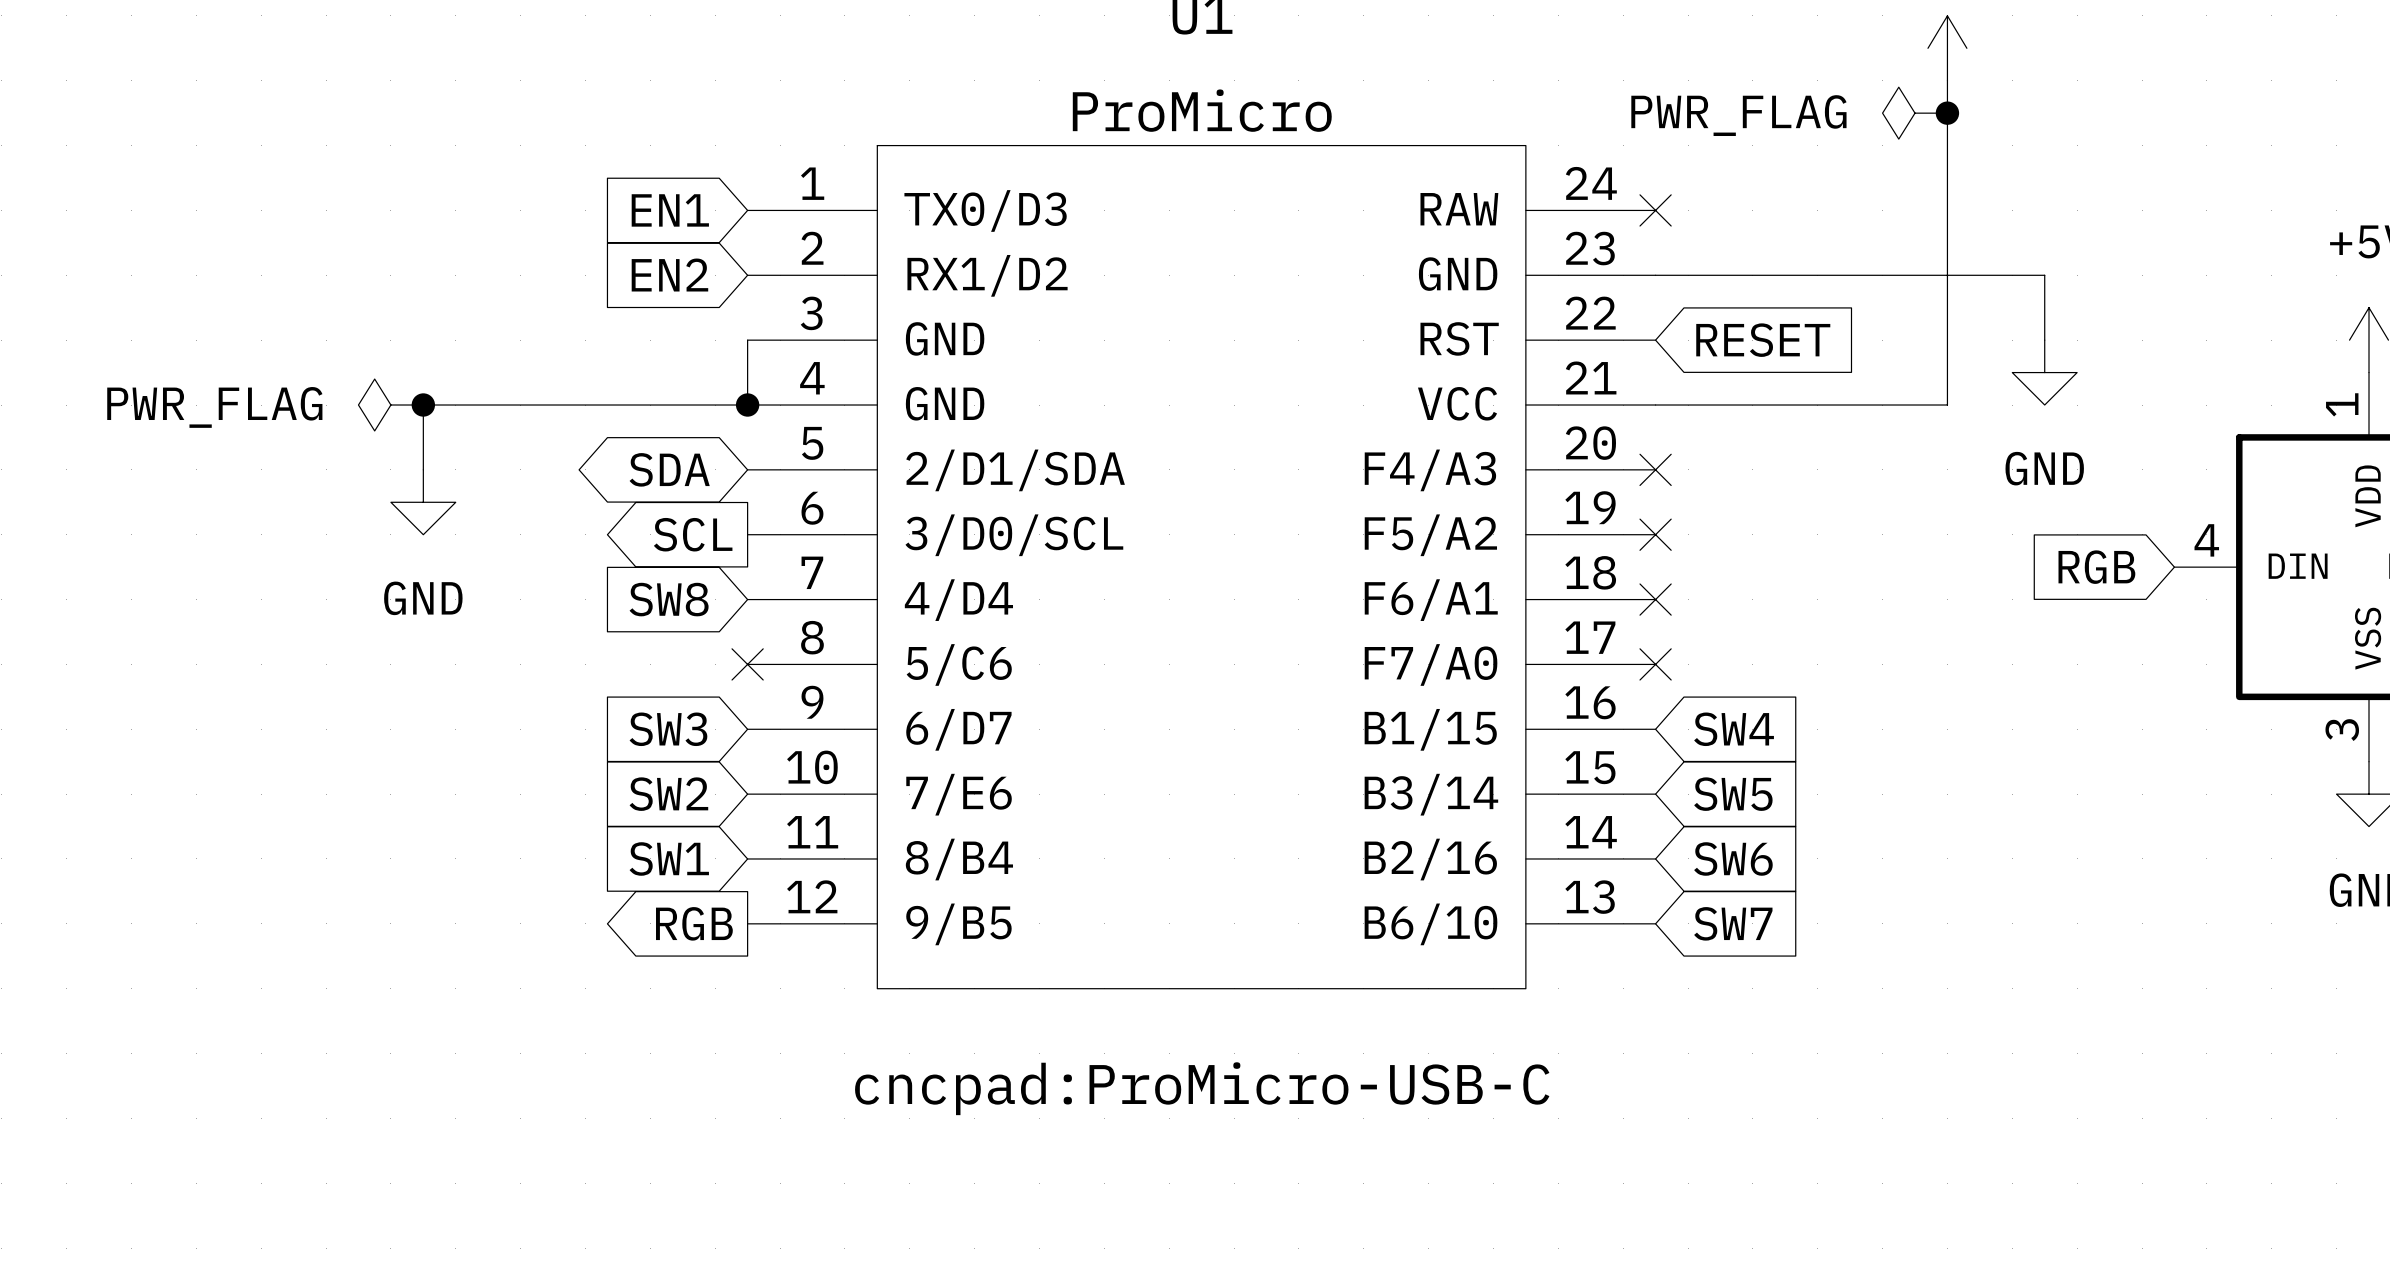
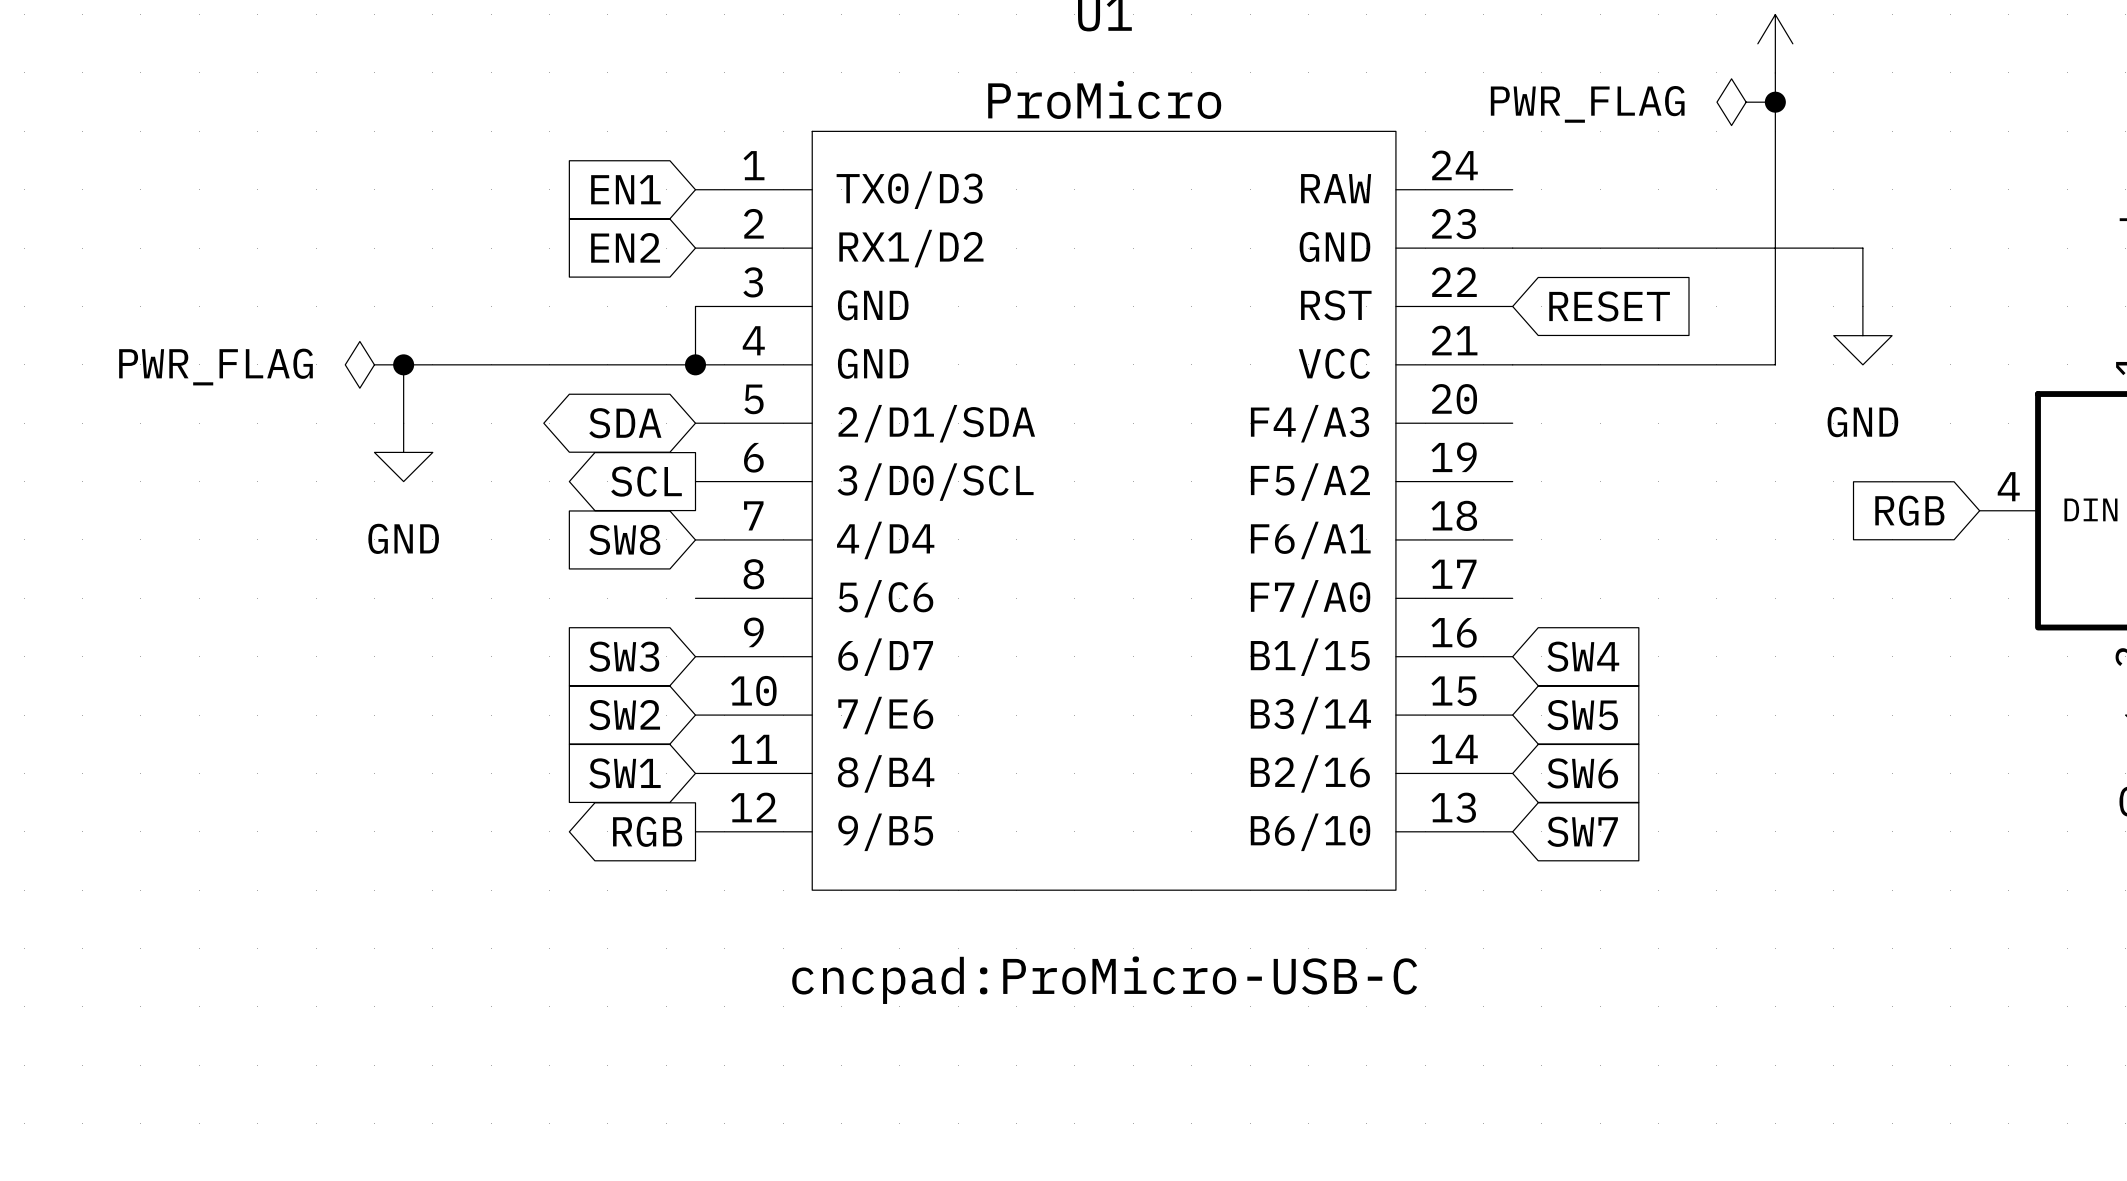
no-connect mark: (1655, 210) -> none
no-connect mark: (1655, 469) -> none
no-connect mark: (1655, 534) -> none
no-connect mark: (1655, 599) -> none
no-connect mark: (747, 664) -> none
no-connect mark: (1655, 664) -> none

